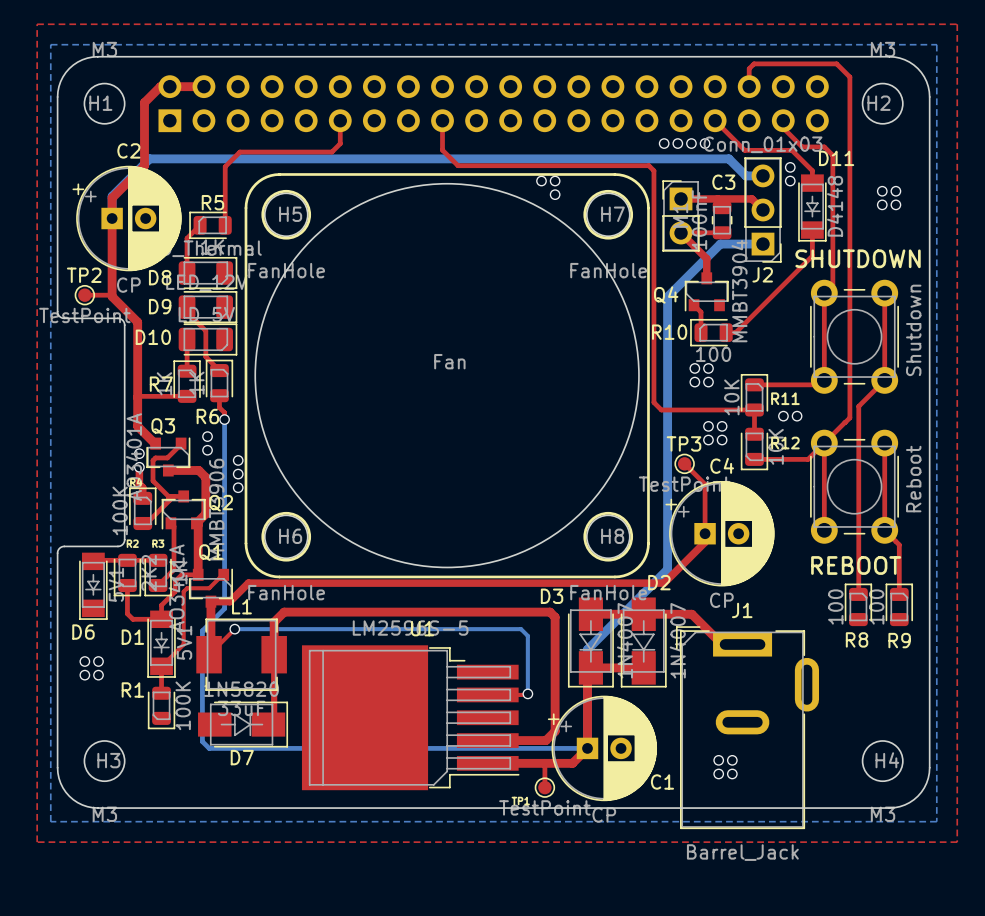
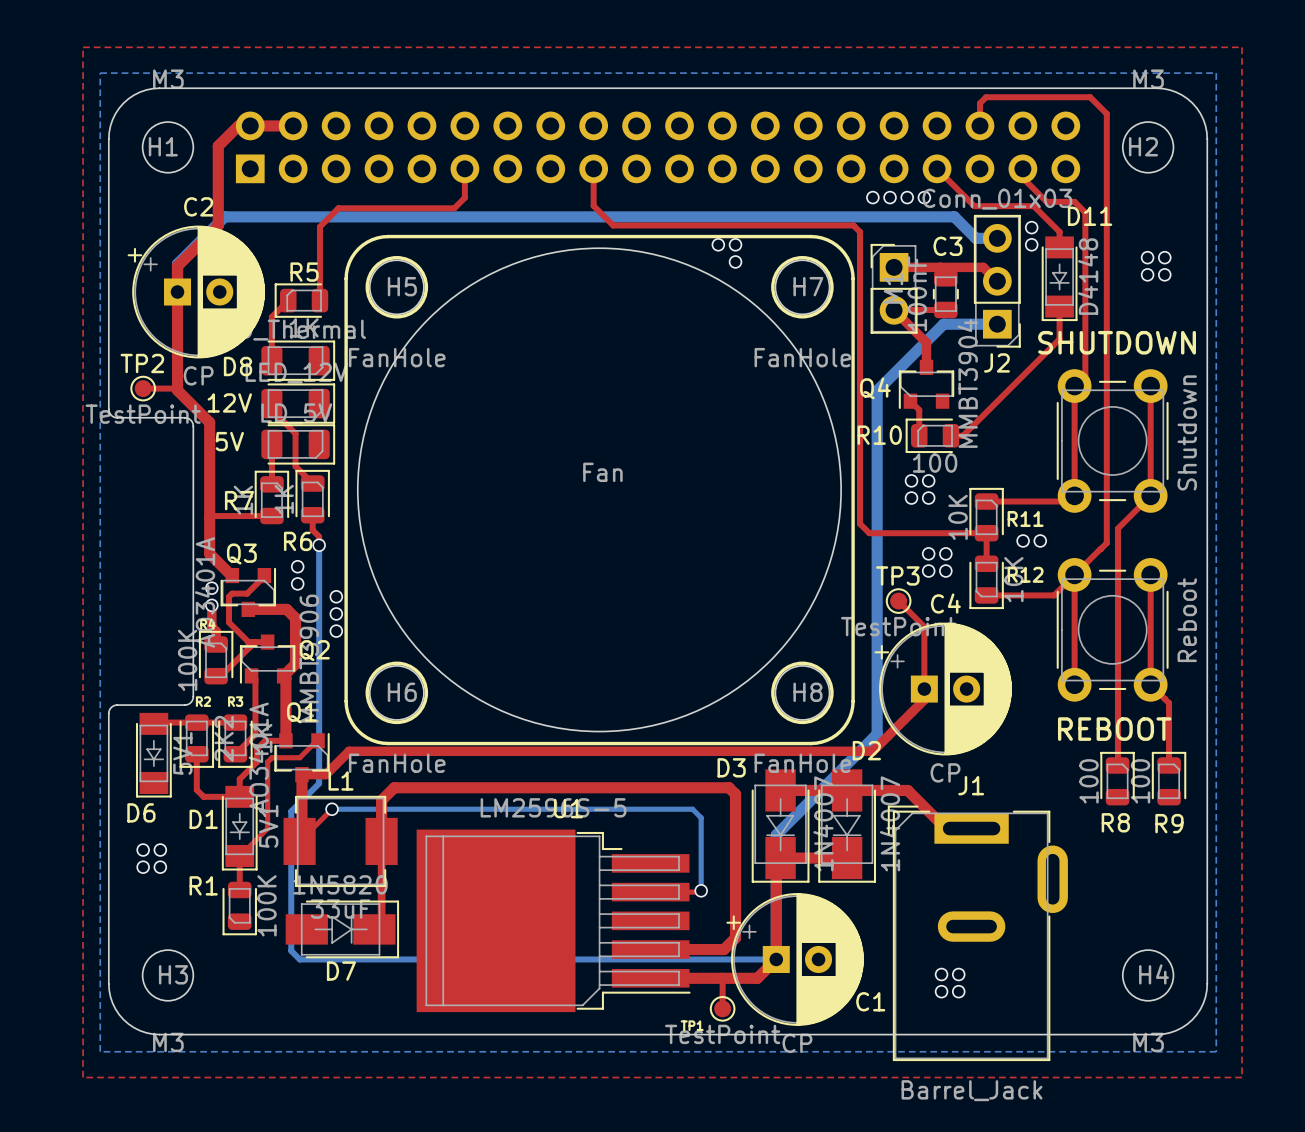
D9 name: D9 (160, 306) -> 12V (229, 402)
D10 name: D10 (153, 337) -> 5V (229, 441)

